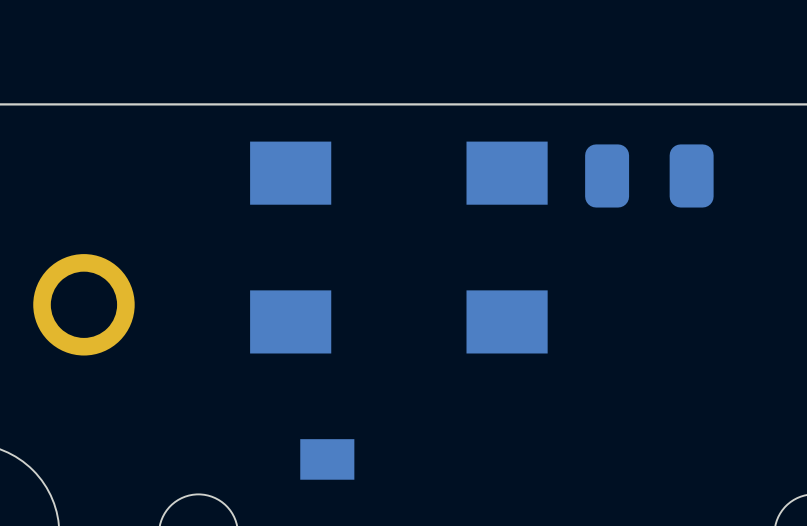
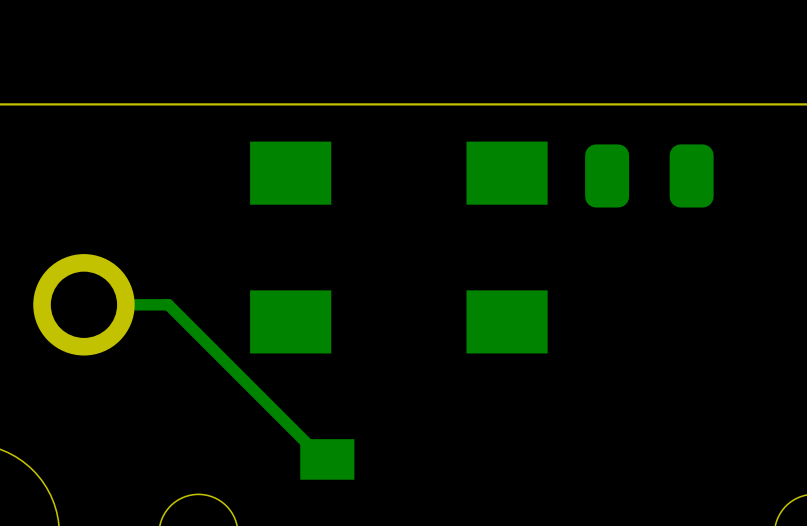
bottom track: none -> (83, 304) (168, 304) (323, 459) (327, 459)

